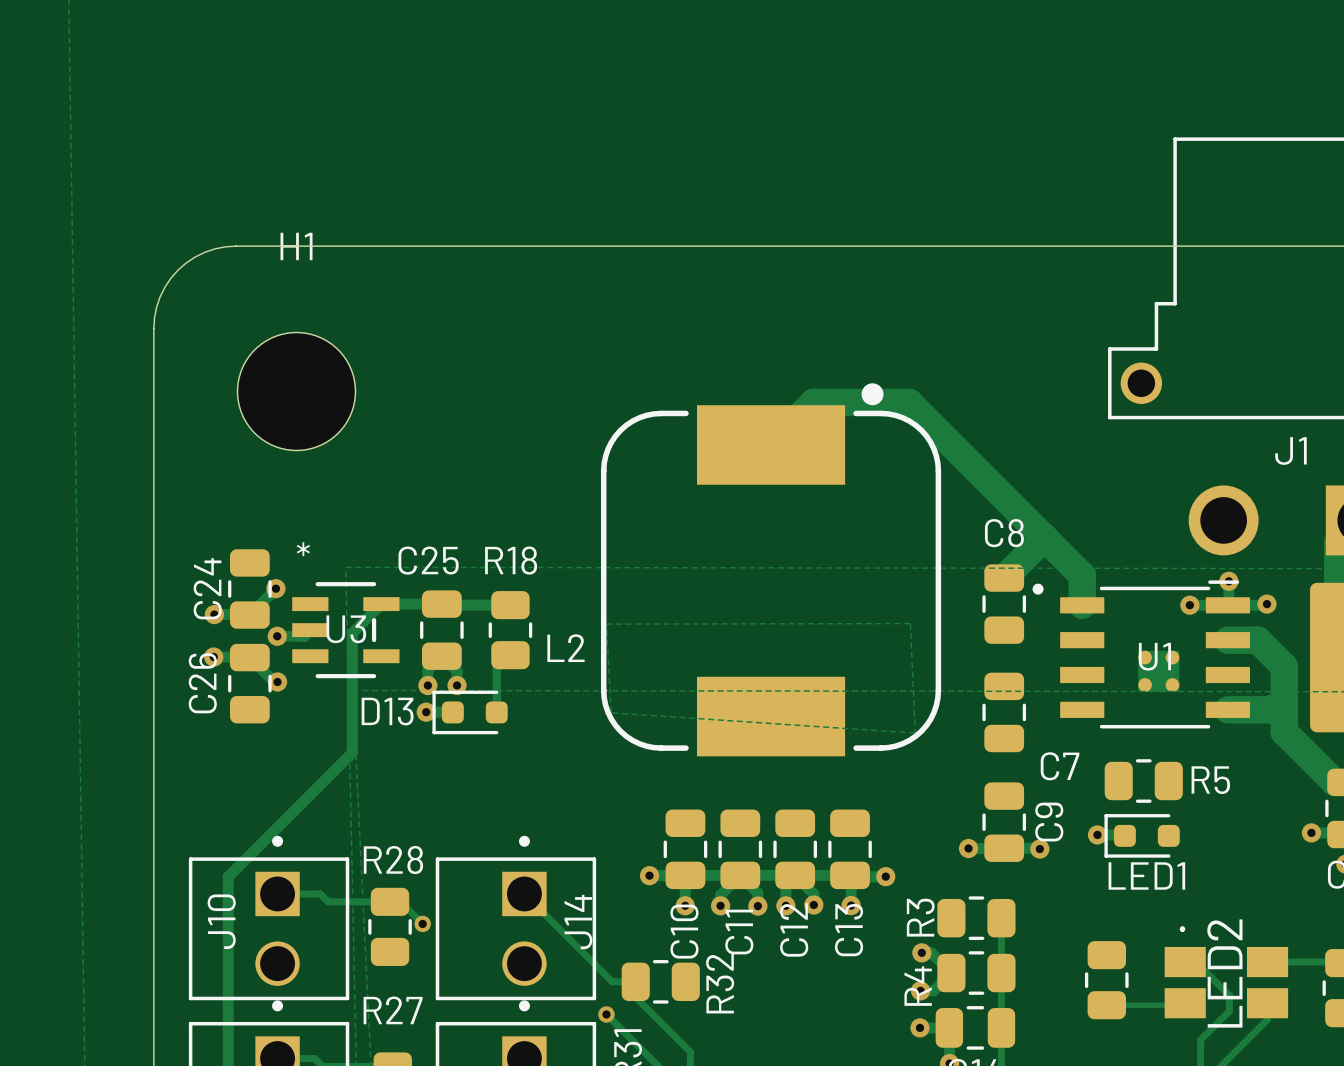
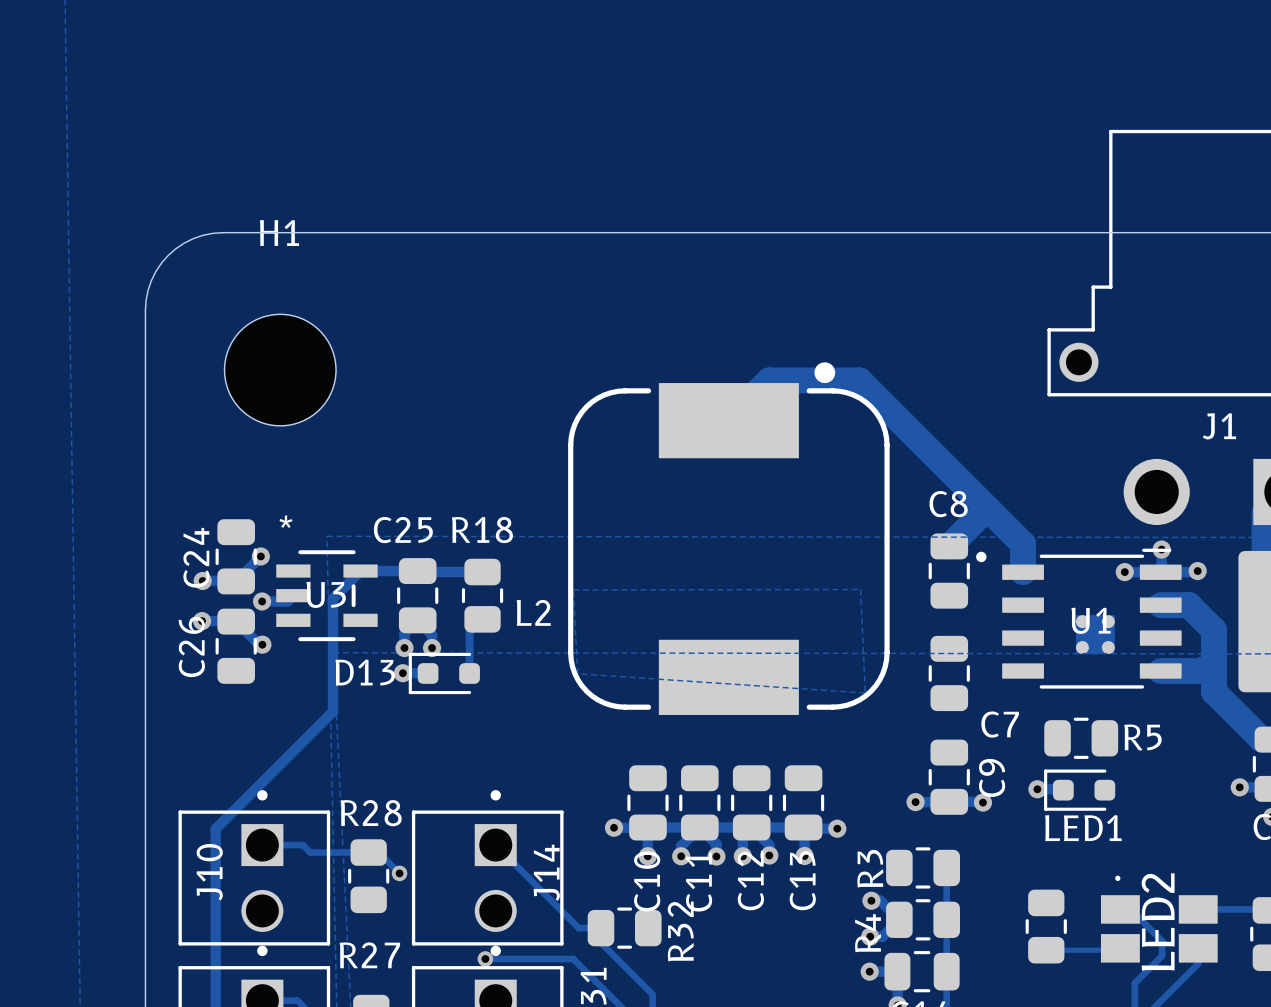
track: none -> (485, 958) (573, 958)
via position: (606, 1014) -> (485, 958)

